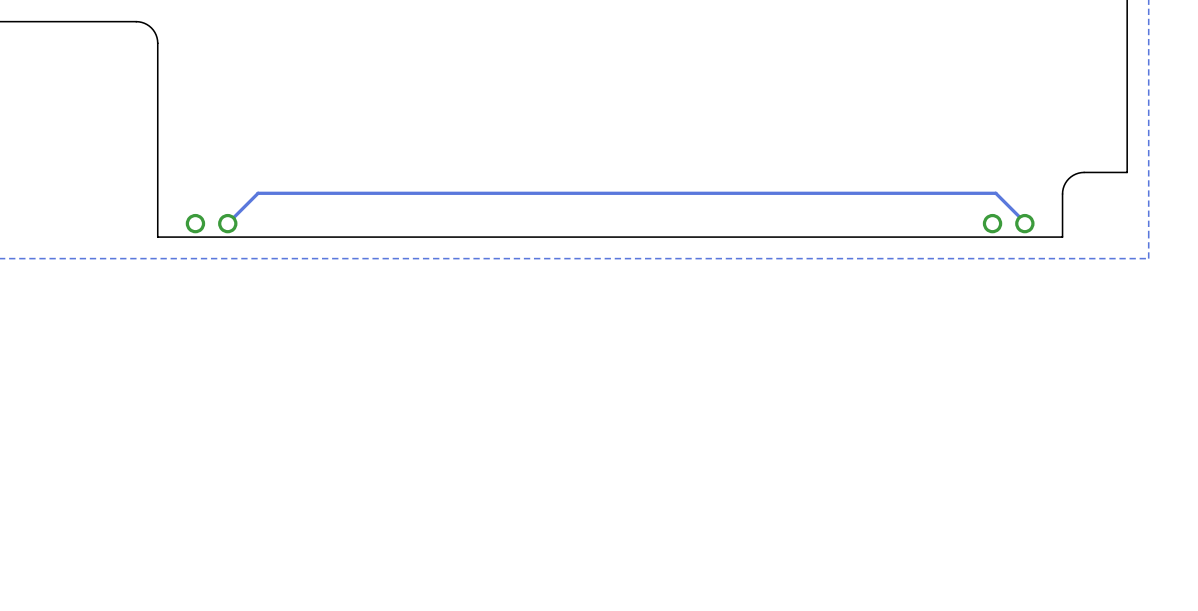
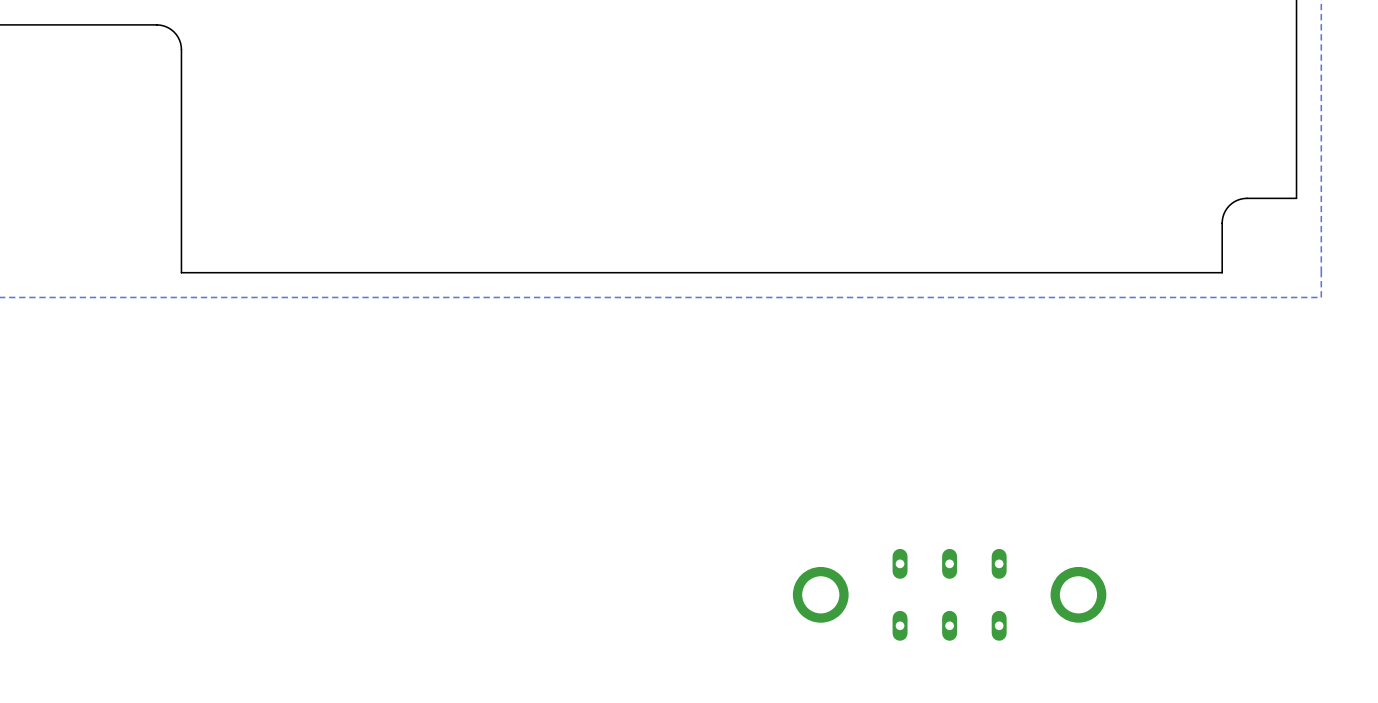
part: (211, 223) -> none
part: (1008, 223) -> none
track: (1024, 223) (995, 193) (258, 193) (227, 223) -> none
part: none -> (949, 594)

